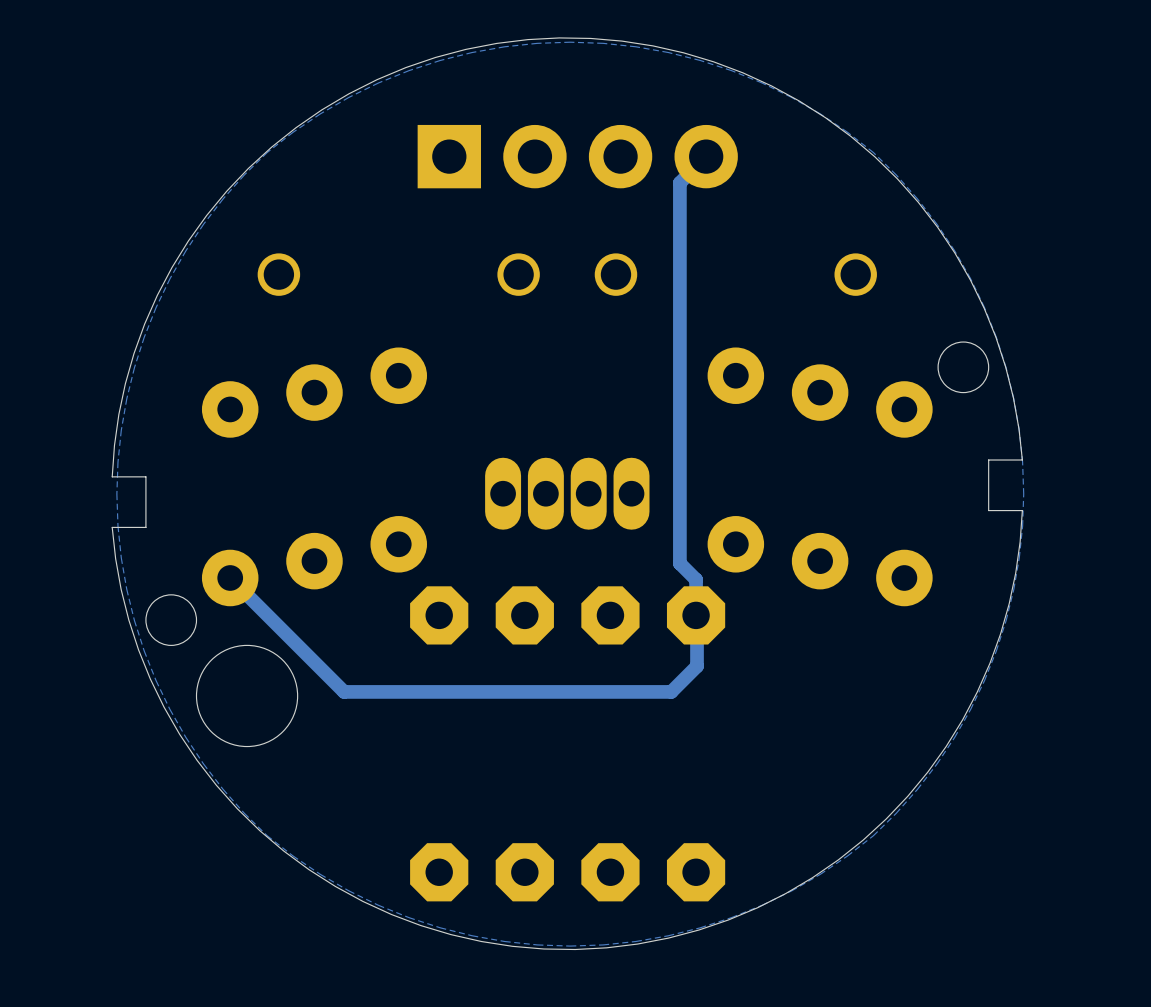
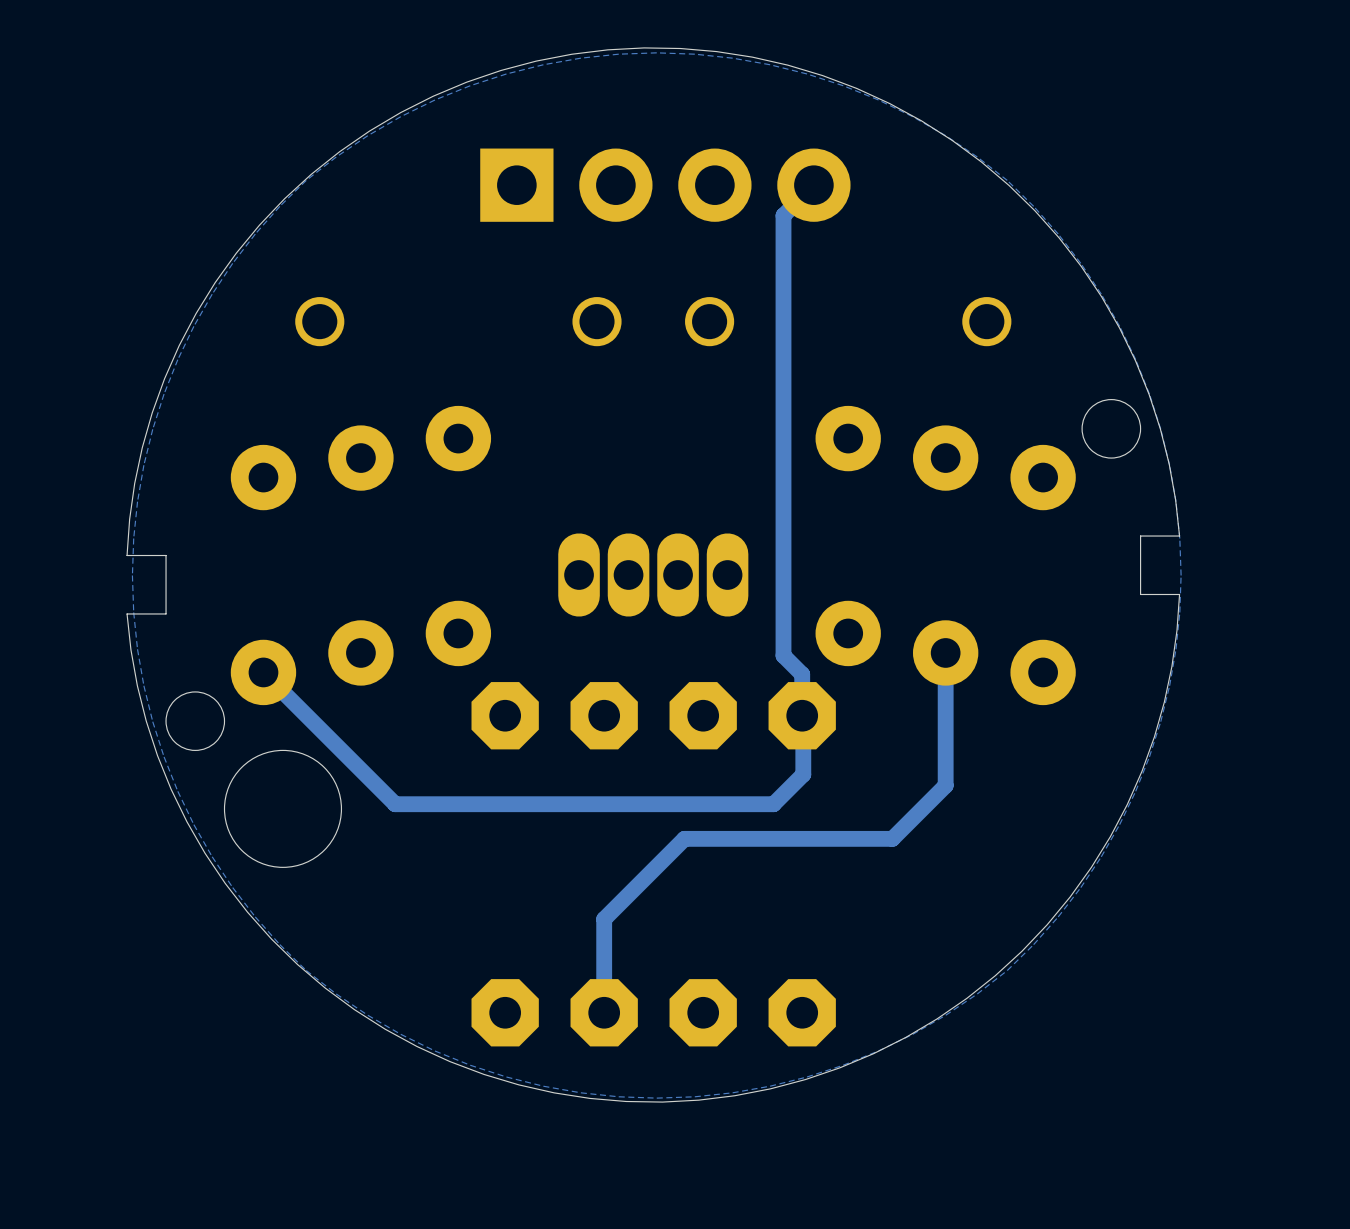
track: none -> (945, 652) (945, 785) (892, 838) (684, 838) (604, 919) (604, 1012)

